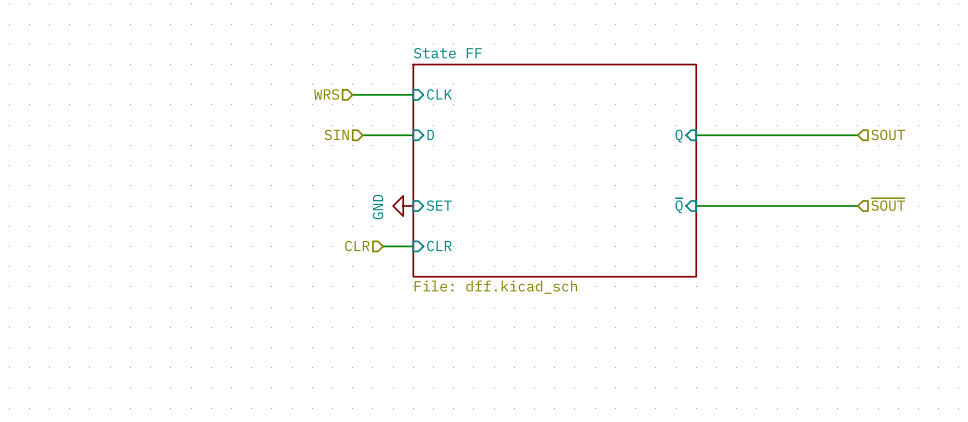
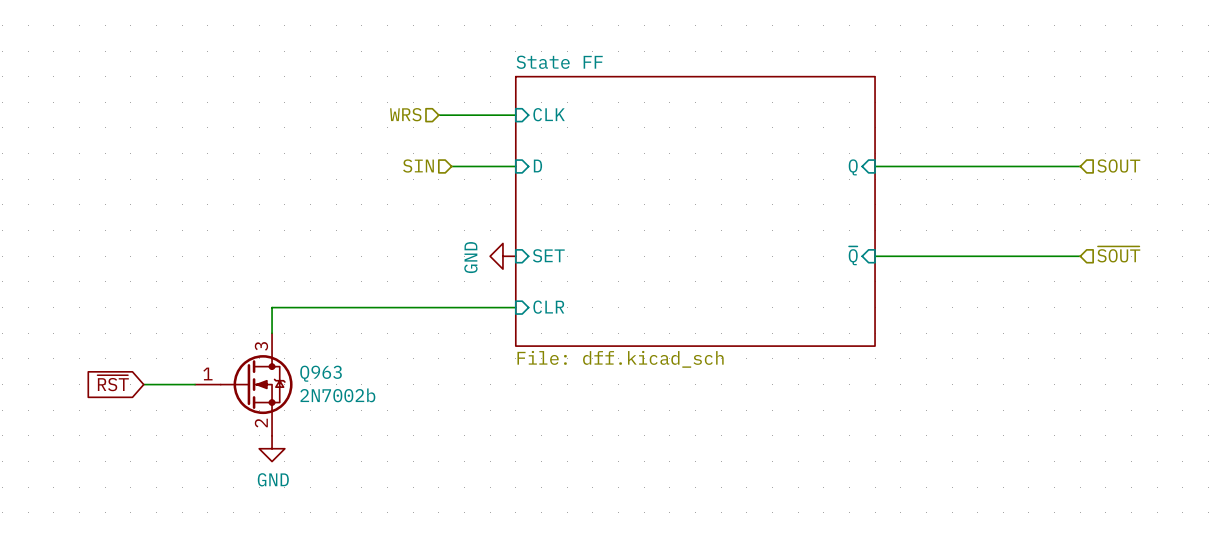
hierarchical label: CLR (357, 246) -> none
wire: none -> (477, 307) (272, 307) (272, 333)
global label: none -> ~{RST} (113, 383)
wire: none -> (143, 384) (195, 384)
Q963: none -> 2N7002b (243, 384)
power symbol: none -> GND (272, 448)

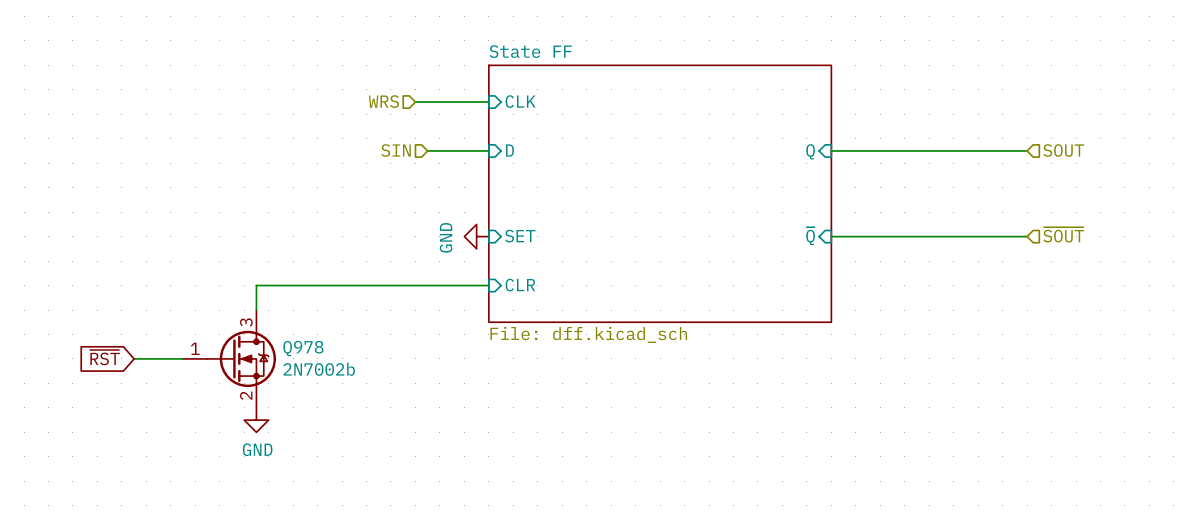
Q963 name: Q963 (321, 373) -> Q978 (303, 348)

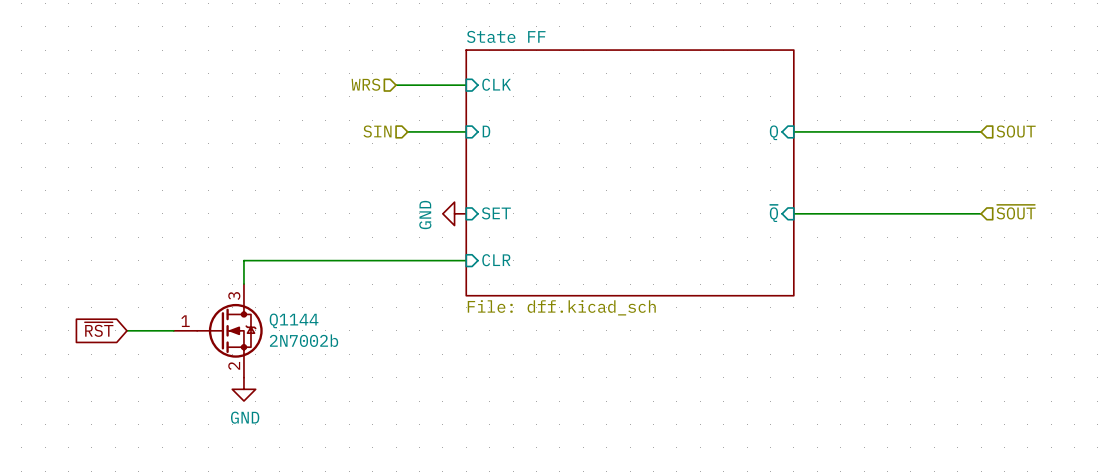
Q978 name: Q978 (303, 348) -> Q1144 (294, 320)

